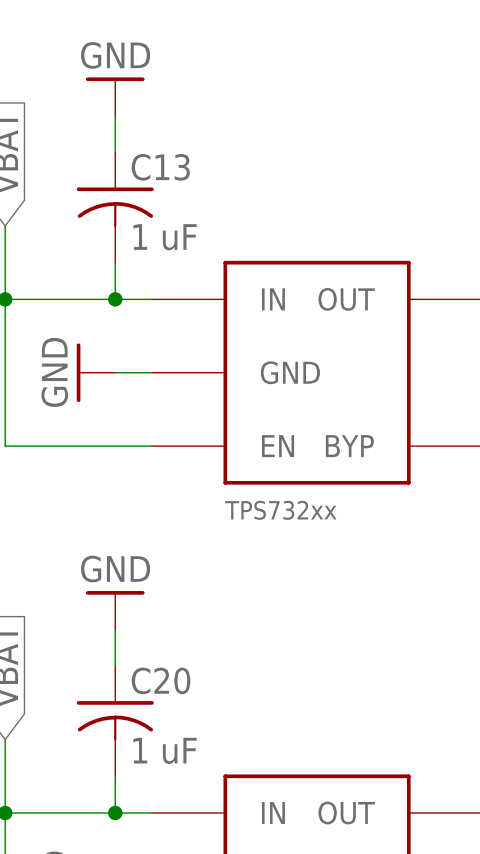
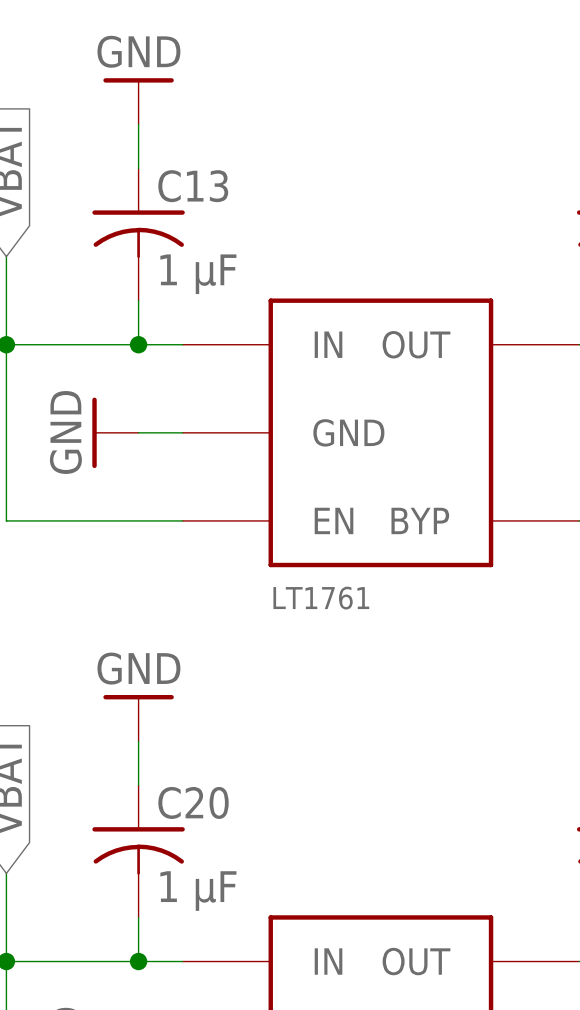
C13 value: 1 uF (165, 237) -> 1 μF (198, 274)
part text: TPS732xx (280, 510) -> LT1761 (321, 598)
C20 value: 1 uF (165, 750) -> 1 μF (198, 891)

